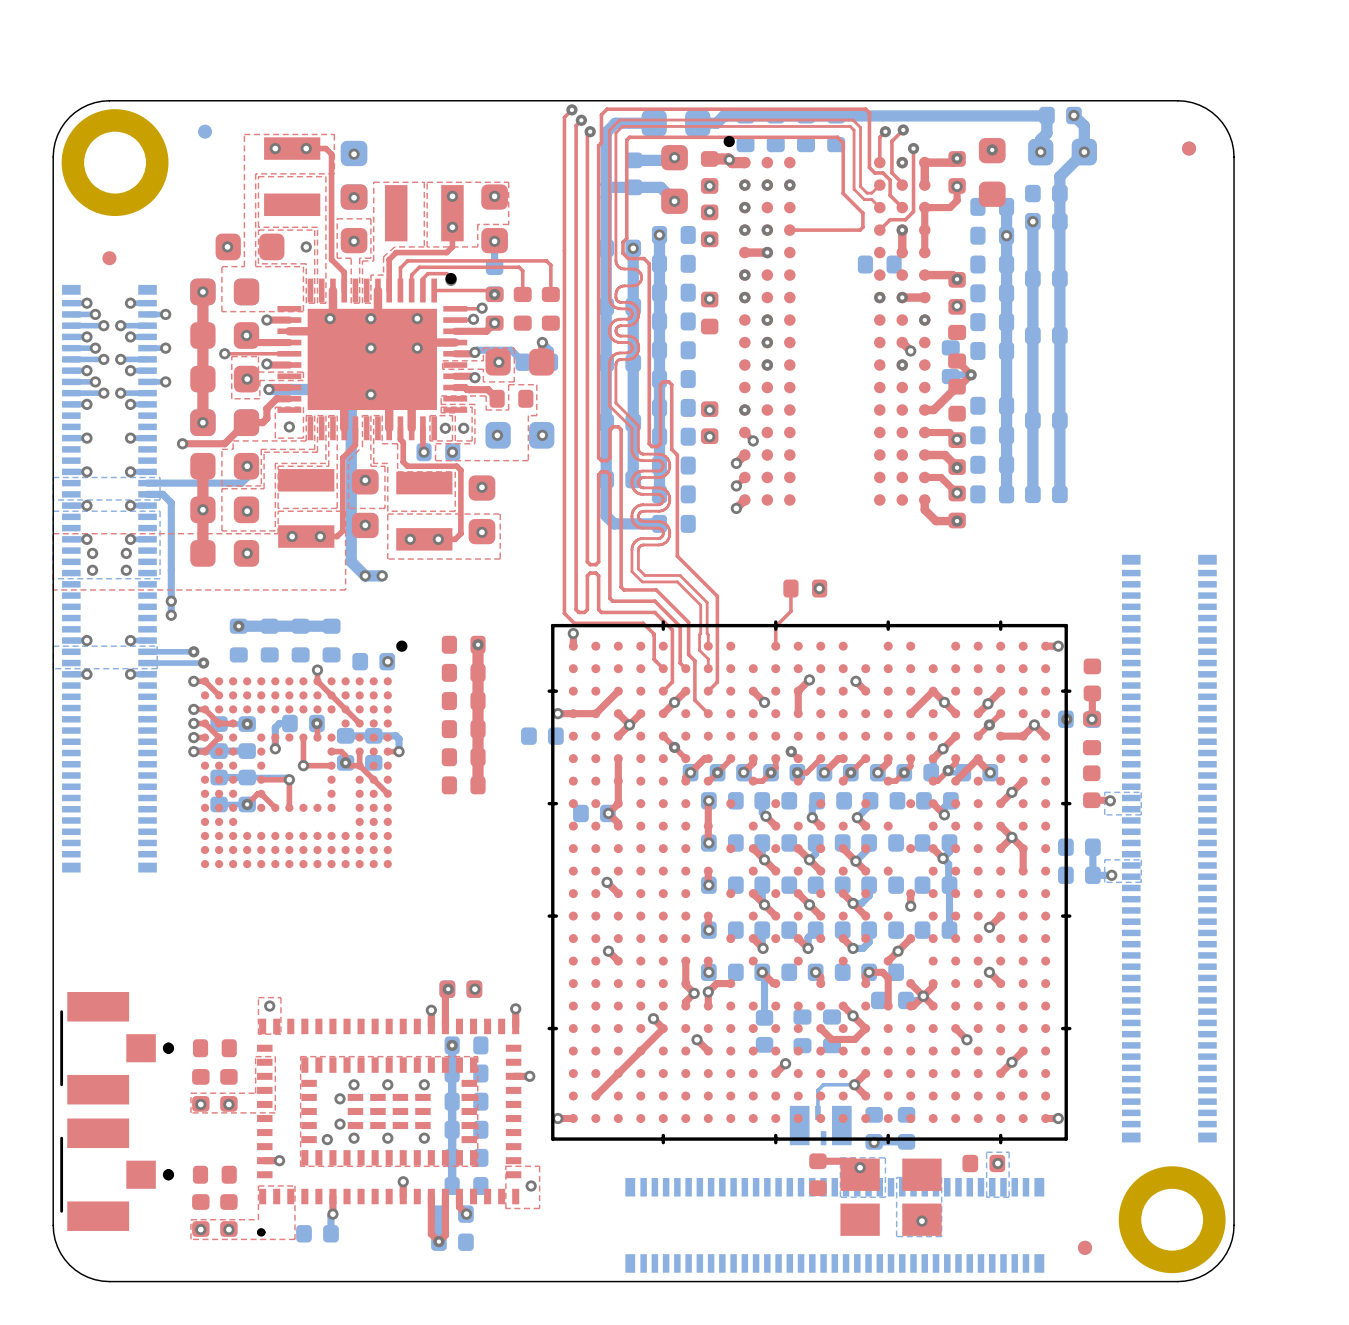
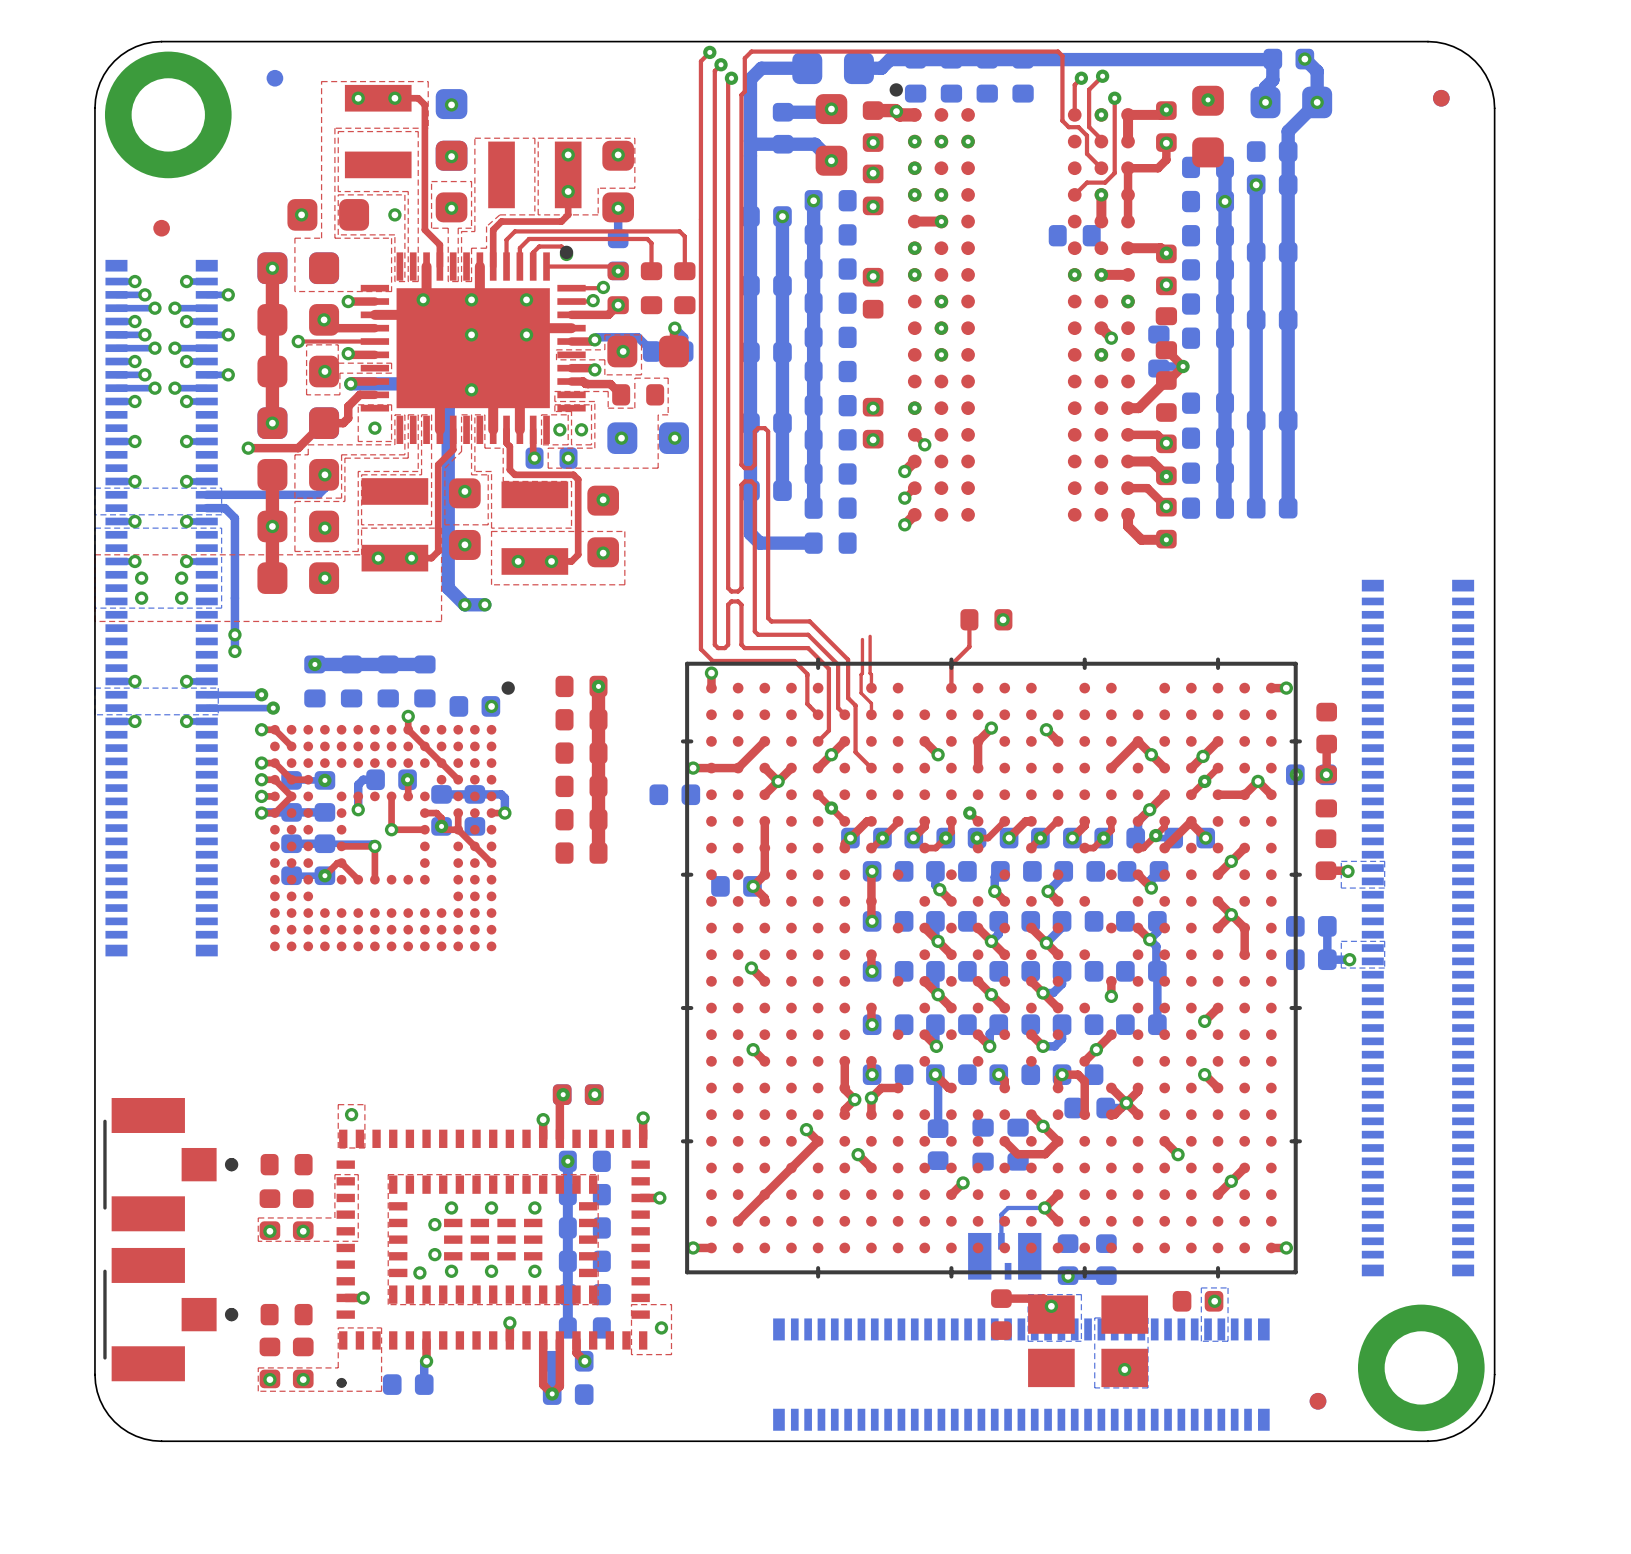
top track: (879, 185) (871, 193) (867, 193) (860, 186) (860, 127) (853, 120) (619, 120) (609, 130) (609, 300) (615, 307) (629, 309) (632, 314) (629, 318) (615, 320) (609, 327) (609, 333) (613, 340) (629, 343) (632, 347) (629, 352) (615, 354) (610, 359) (609, 405) (631, 428) (631, 449) (634, 456) (640, 460) (659, 460) (663, 465) (659, 470) (638, 472) (632, 479) (632, 485) (636, 491) (642, 494) (659, 494) (663, 499) (659, 504) (642, 504) (636, 507) (632, 513) (633, 521) (640, 527) (660, 528) (663, 533) (659, 538) (640, 538) (634, 542) (631, 549) (631, 571) (642, 581) (677, 581) (700, 605) -> none
top track: (879, 207) (871, 199) (864, 199) (854, 189) (854, 130) (850, 126) (622, 126) (615, 133) (616, 262) (620, 268) (636, 269) (641, 277) (636, 285) (620, 286) (616, 292) (617, 301) (632, 303) (636, 306) (638, 313) (634, 323) (618, 326) (616, 333) (619, 335) (634, 338) (638, 348) (636, 355) (632, 358) (619, 359) (616, 362) (615, 403) (638, 425) (639, 452) (663, 455) (667, 458) (669, 465) (668, 471) (663, 476) (642, 477) (638, 481) (641, 487) (661, 488) (668, 494) (669, 502) (665, 508) (658, 511) (642, 511) (638, 516) (642, 521) (663, 522) (668, 527) (669, 533) (667, 540) (663, 543) (639, 546) (638, 568) (644, 575) (680, 575) (707, 602) -> none
top track: (789, 230) (860, 230) (862, 227) (862, 213) (843, 193) (843, 142) (837, 137) (629, 137) (626, 140) (626, 238) (623, 242) (623, 253) (628, 258) (644, 258) (649, 263) (649, 443) (652, 446) (657, 446) (660, 443) (660, 384) (663, 381) (668, 381) (671, 384) (671, 449) (677, 455) (677, 556) (717, 596) (717, 682) (708, 691) -> none

